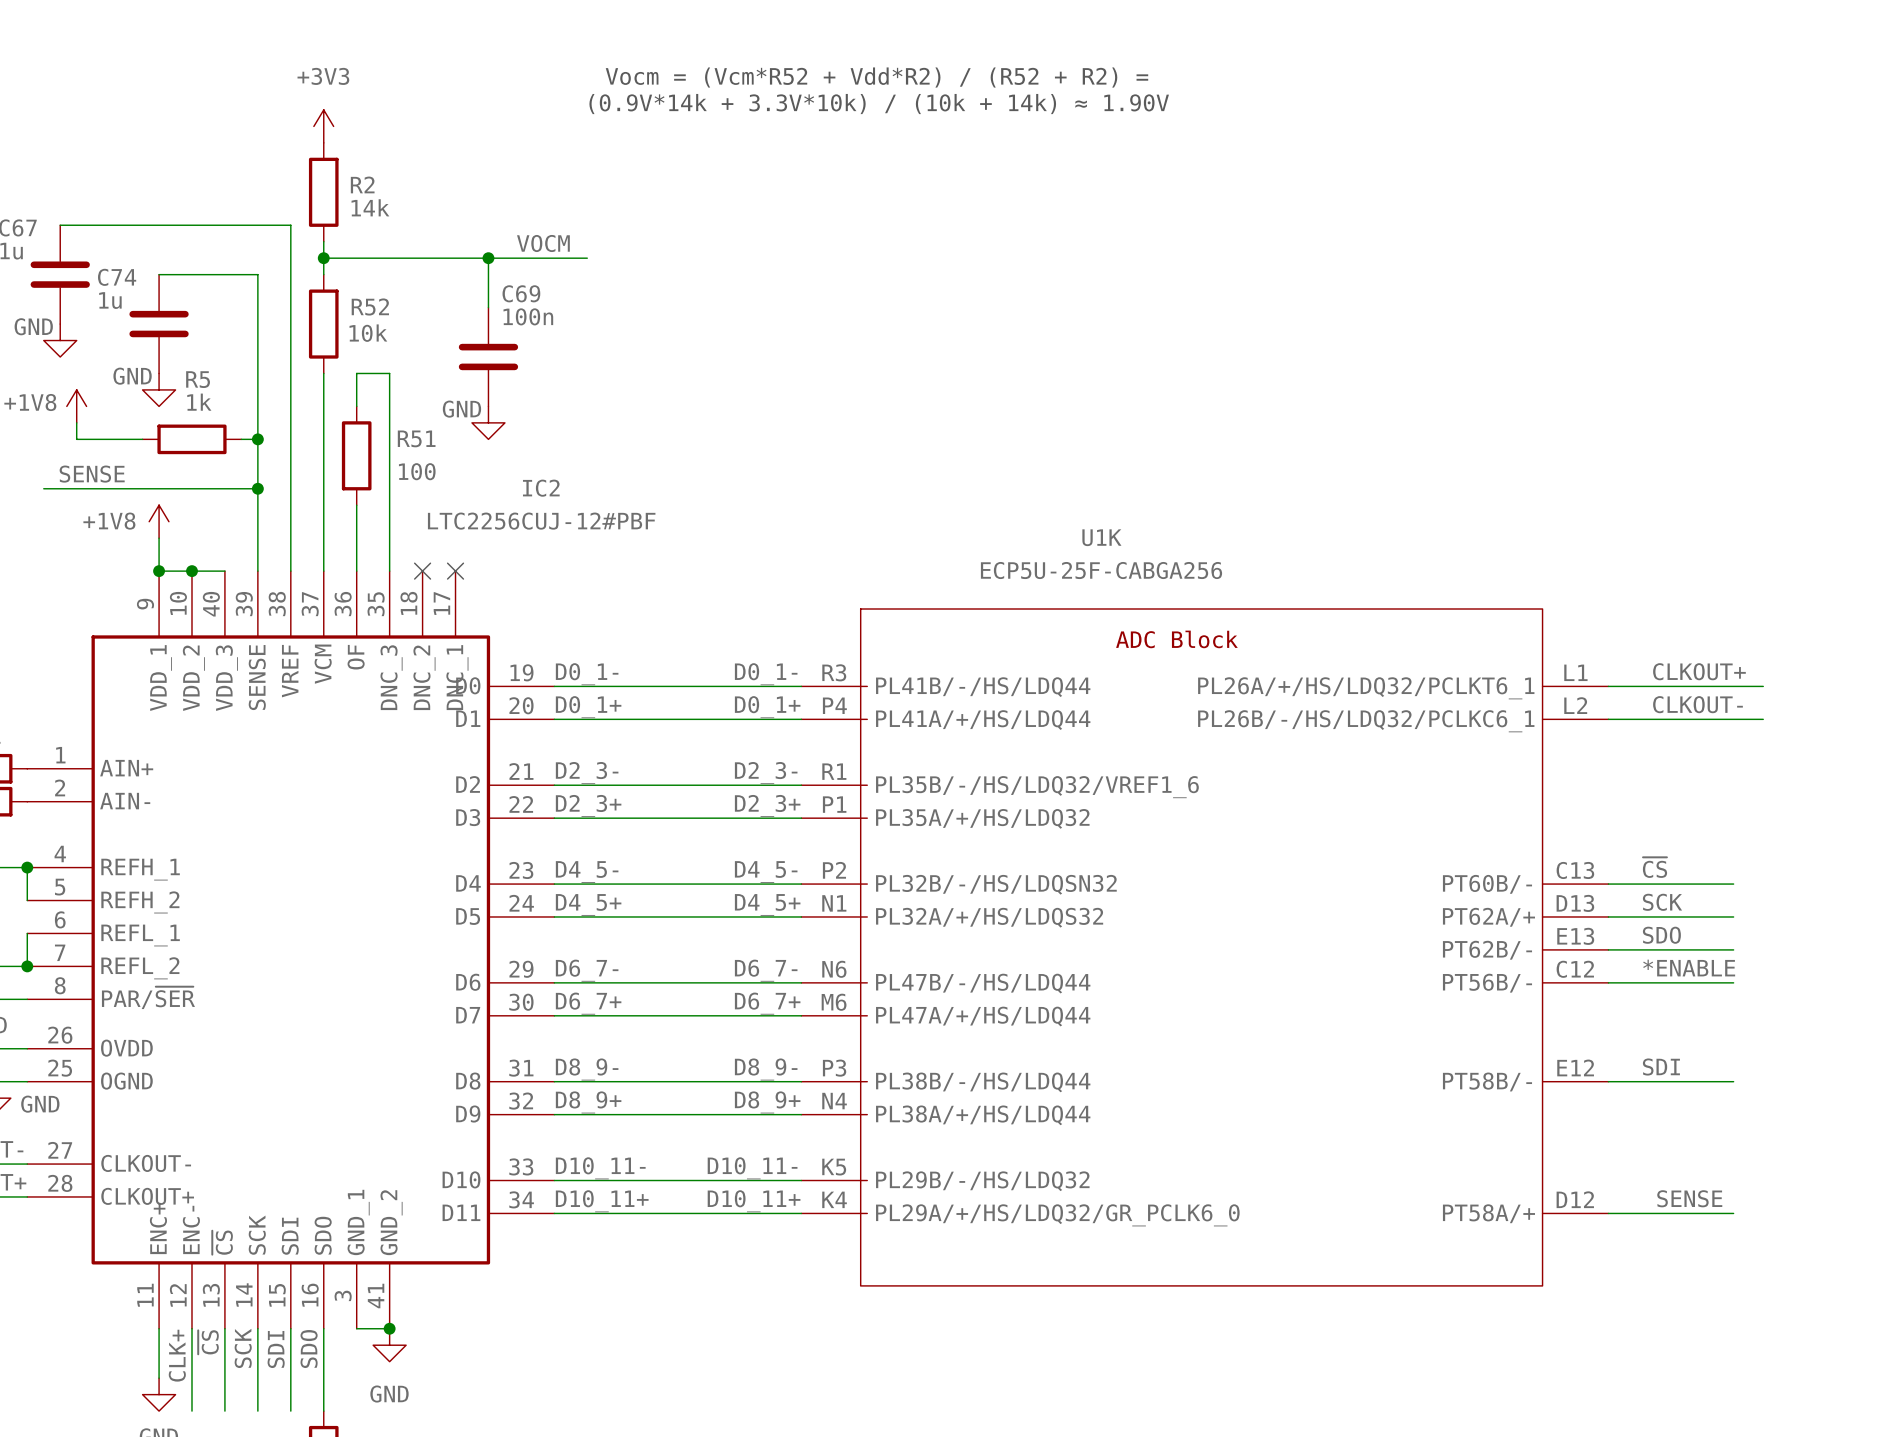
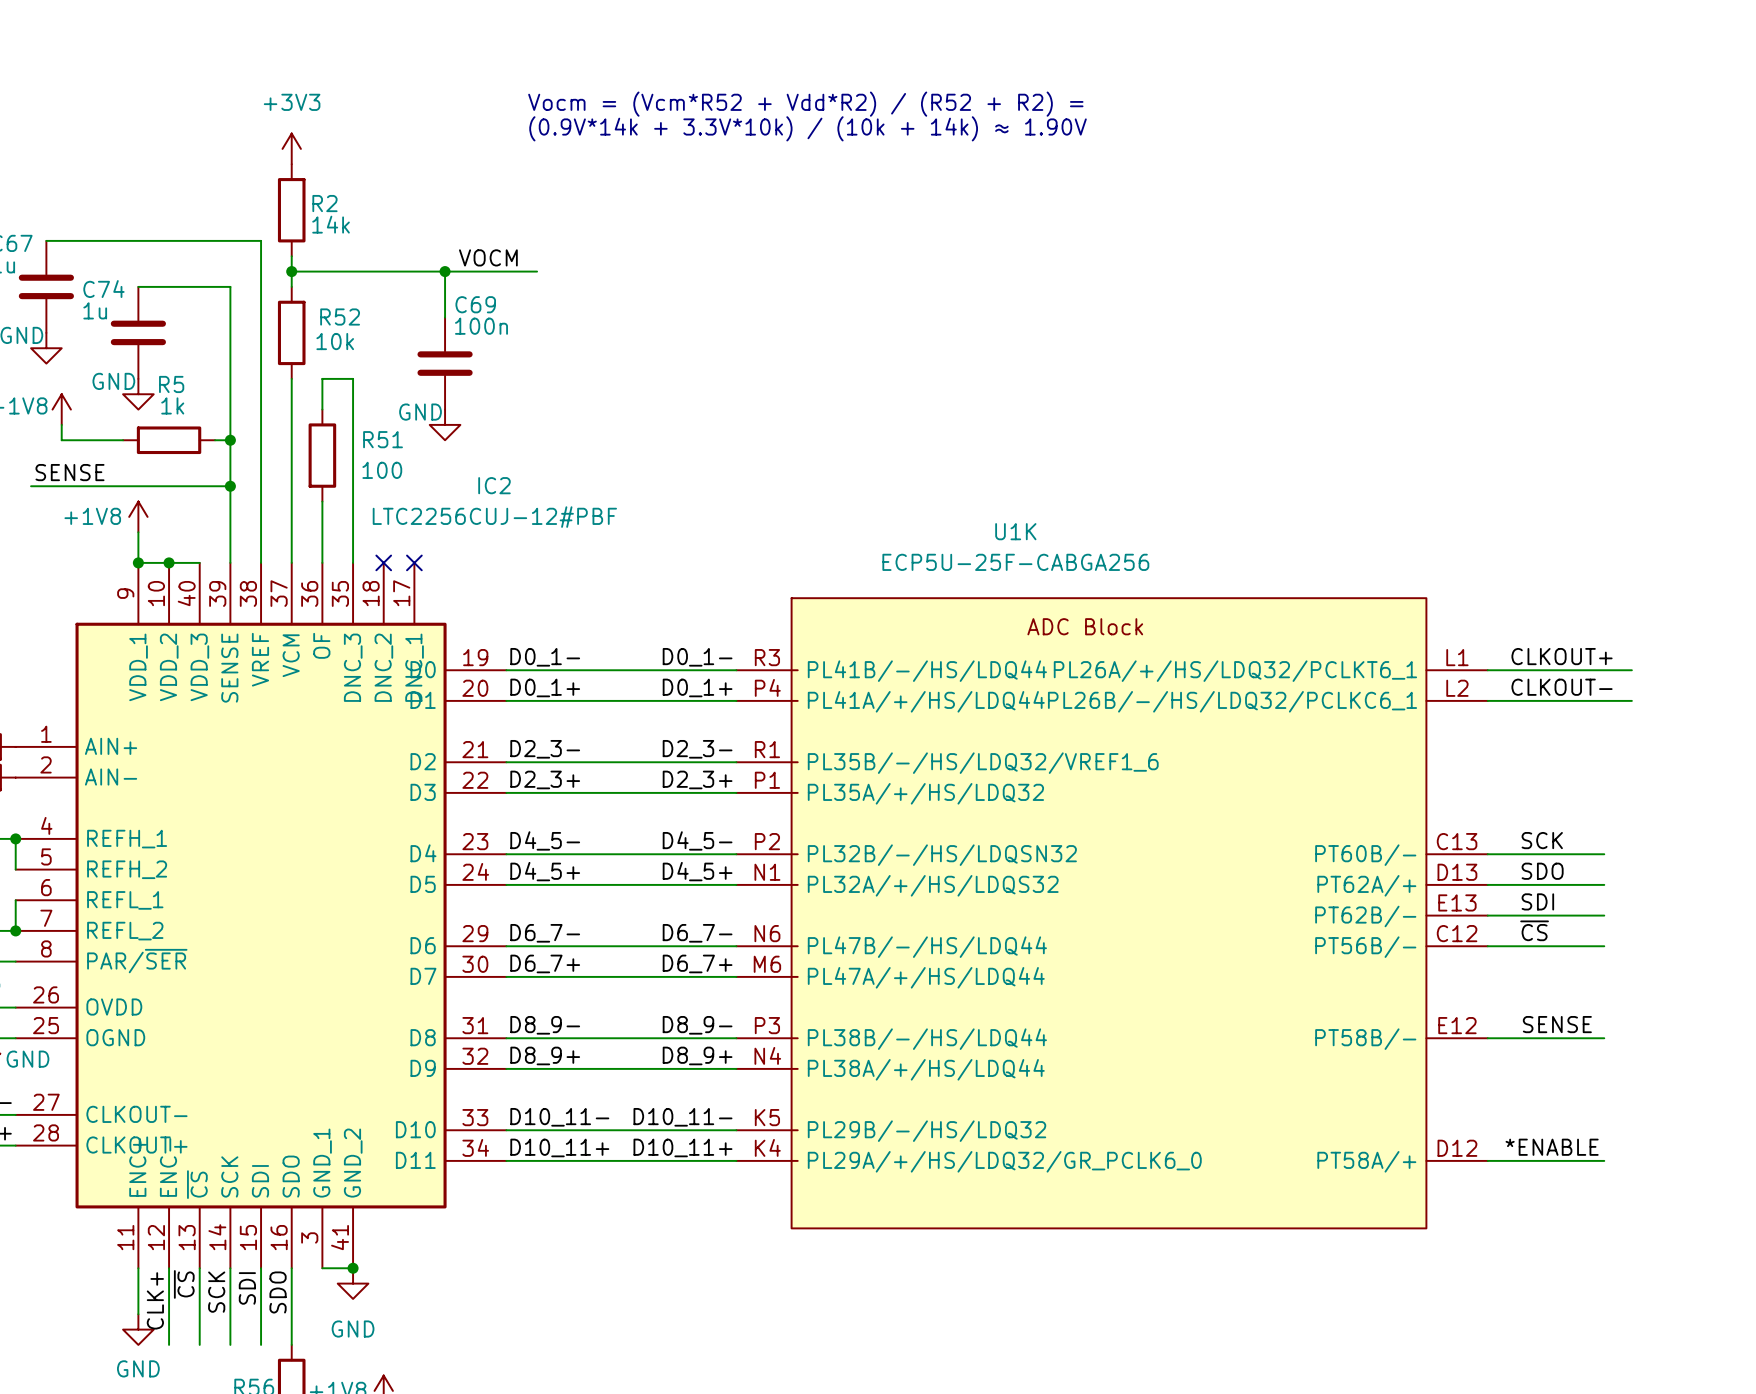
label: ~{CS} (1654, 867) -> SCK (1542, 840)
label: SCK (1662, 902) -> SDO (1542, 871)
label: SDO (1661, 935) -> SDI (1537, 901)
label: *ENABLE (1689, 968) -> ~{CS} (1534, 930)
label: SDI (1661, 1067) -> none
label: none -> *ENABLE (1552, 1147)
label position: SENSE (1689, 1198) -> SENSE (1557, 1024)

